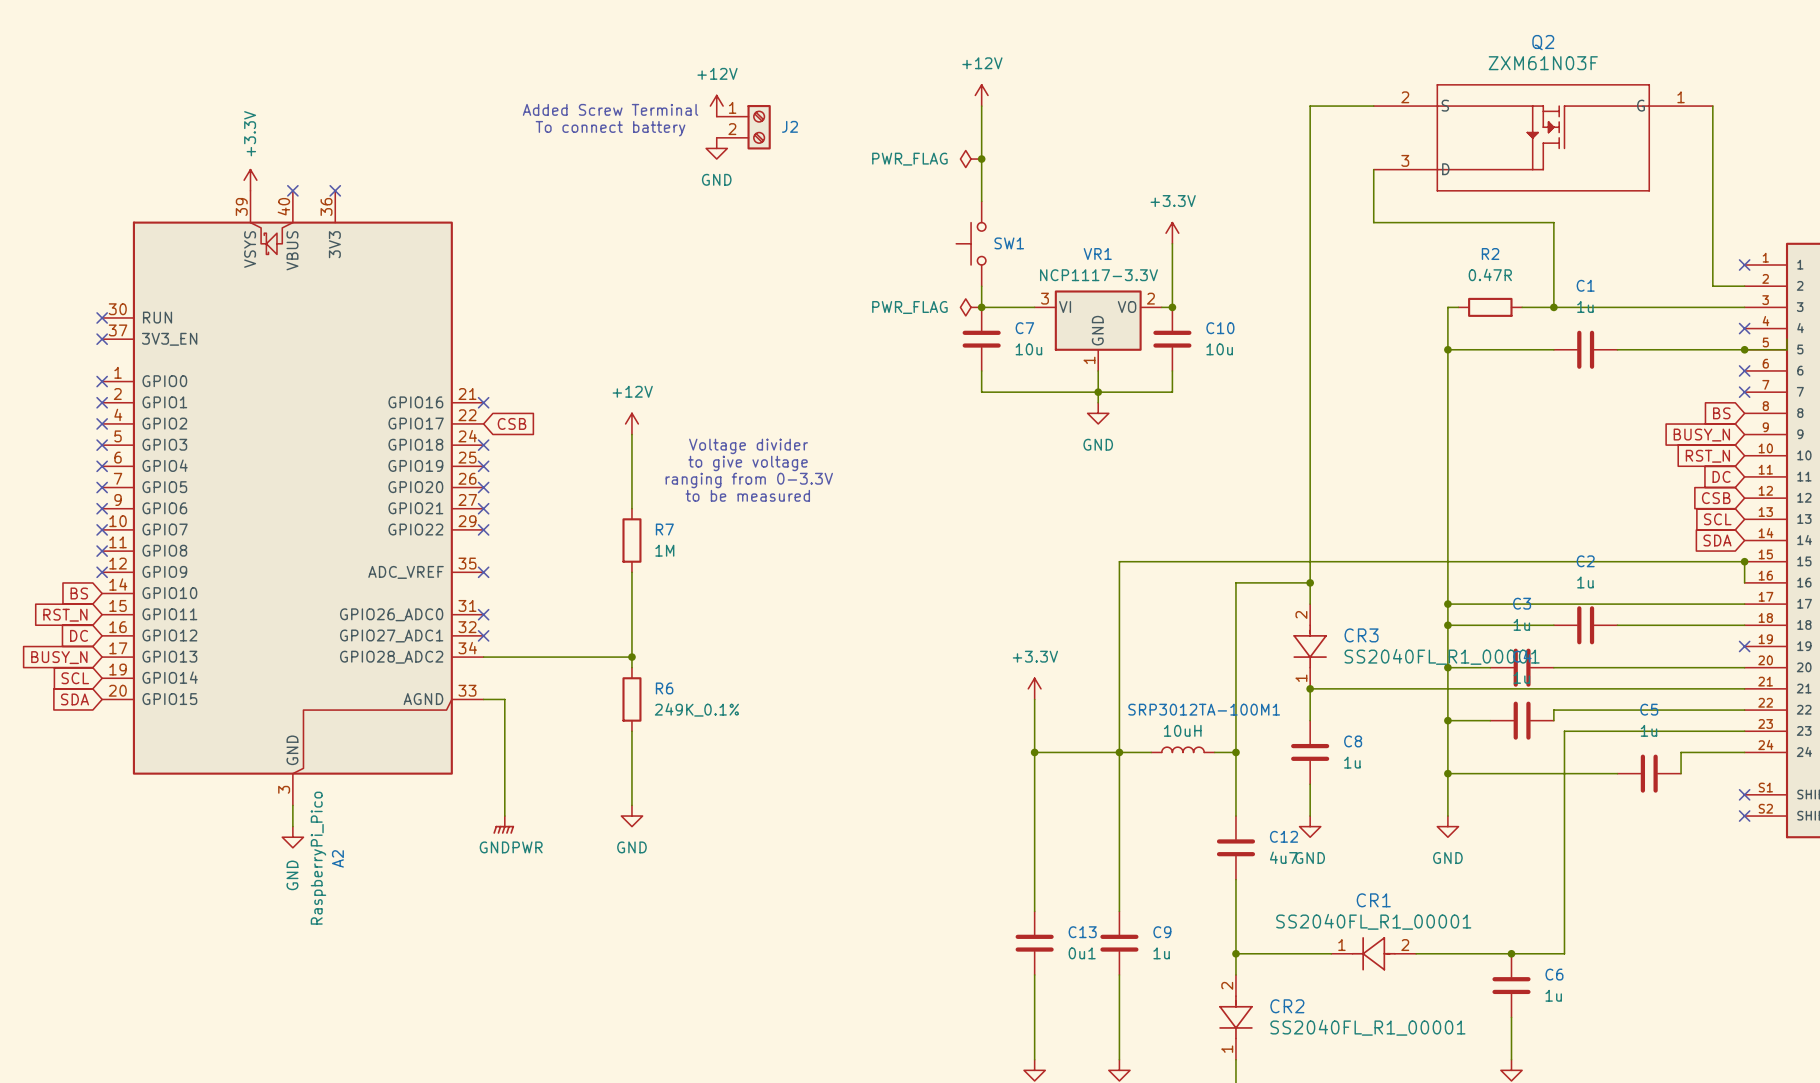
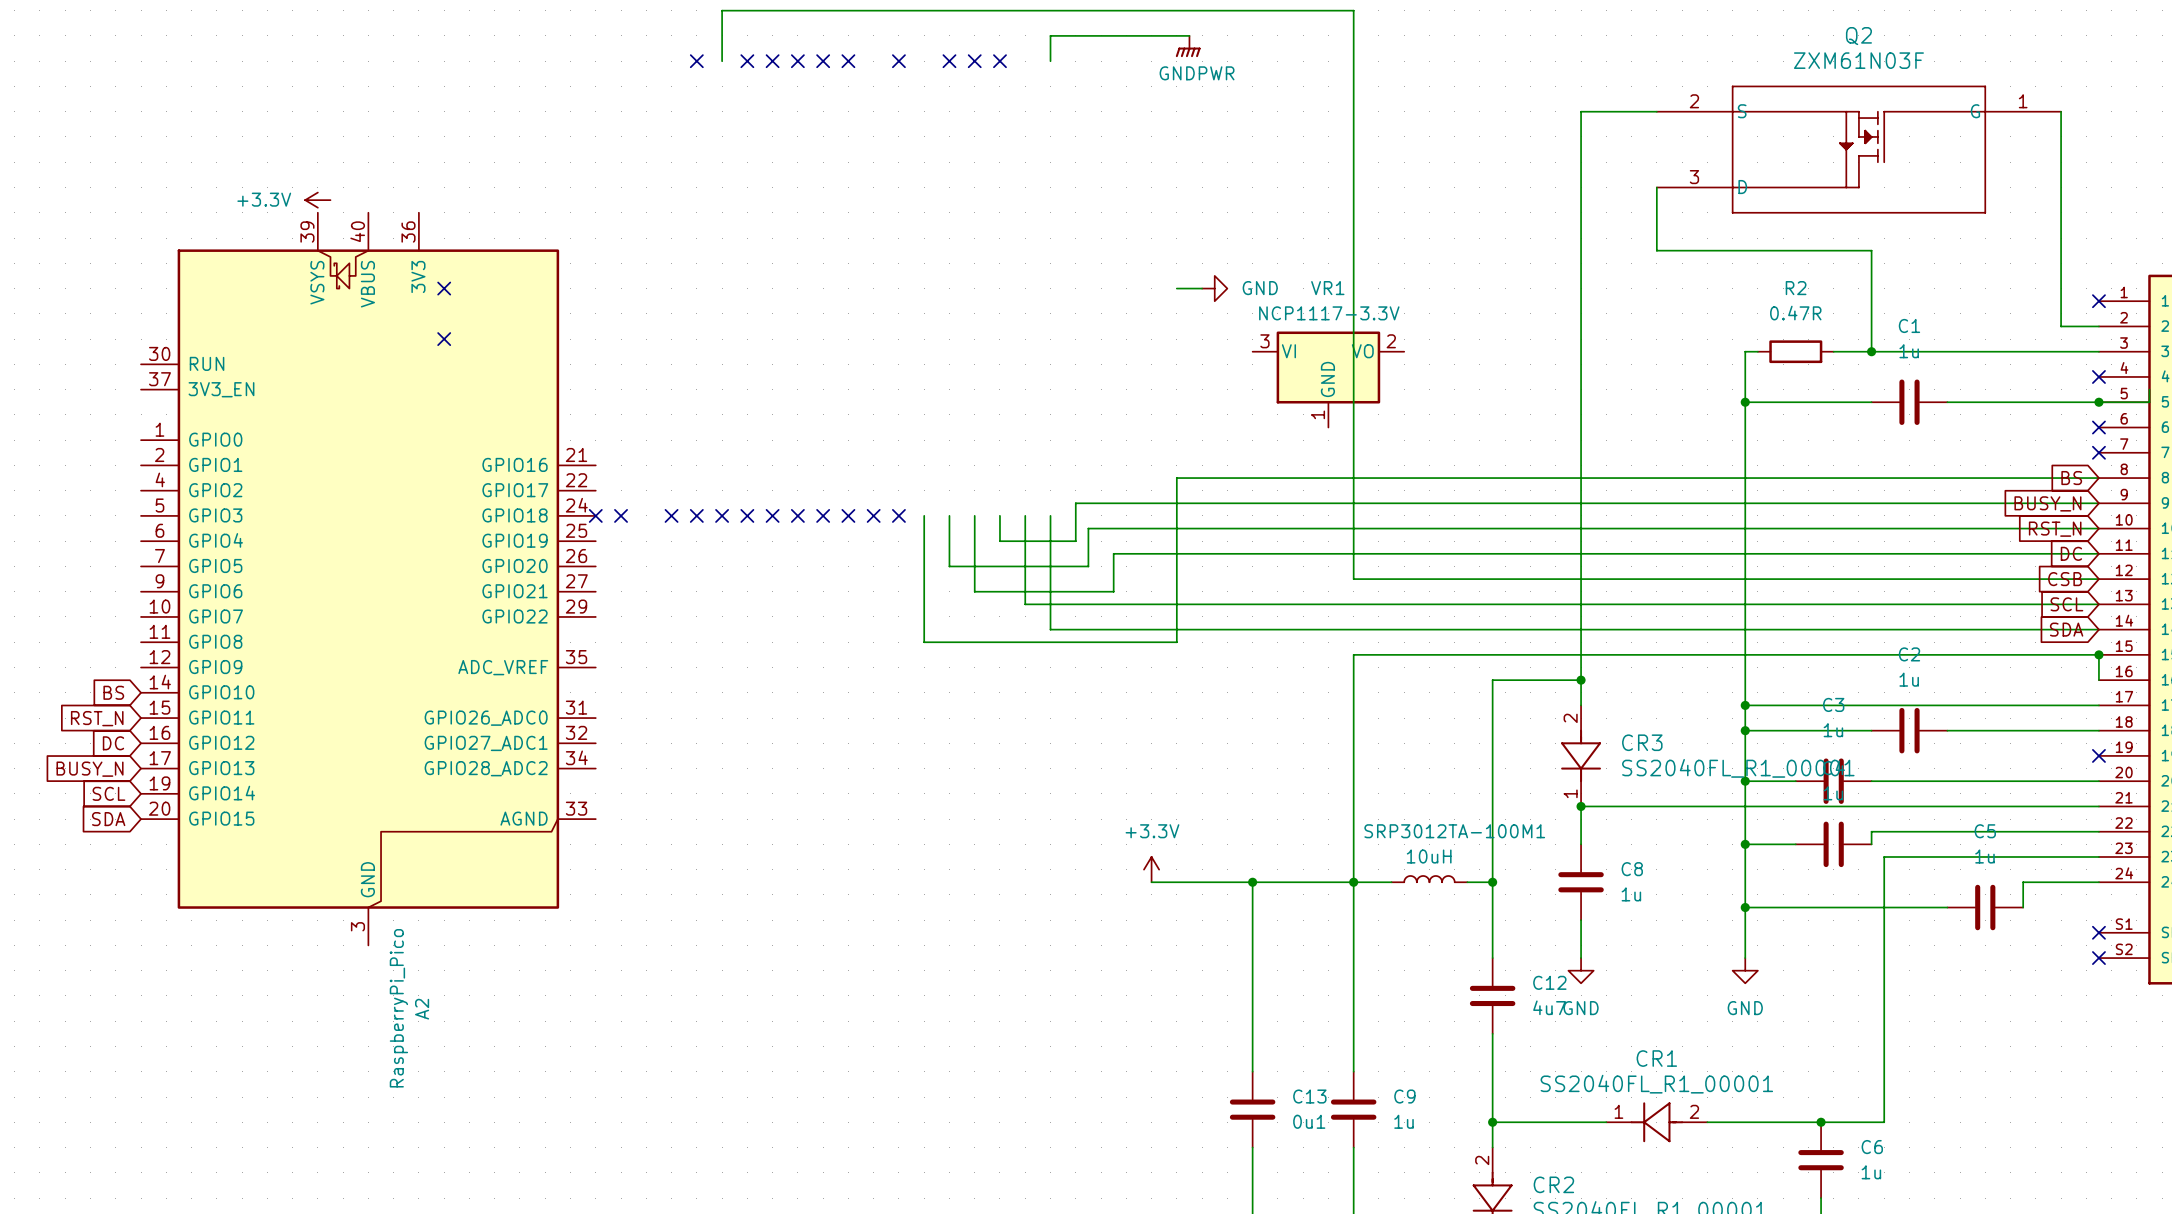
wire: none -> (1189, 35) (1050, 35) (1050, 61)
power symbol: none -> GNDPWR (1188, 46)
no-connect mark: none -> (696, 61)
wire: none -> (722, 61) (722, 10) (1353, 10) (1353, 579) (2098, 579)
no-connect mark: none -> (747, 61)
no-connect mark: none -> (772, 61)
no-connect mark: none -> (797, 61)
no-connect mark: none -> (823, 61)
no-connect mark: none -> (848, 61)
no-connect mark: none -> (898, 61)
no-connect mark: none -> (949, 61)
no-connect mark: none -> (974, 61)
no-connect mark: none -> (999, 61)
power symbol: +12V (981, 95) -> none
power symbol: +12V (716, 106) -> none
wire: (981, 106) (981, 201) -> none
text: Added Screw Terminal (610, 109) -> none
J2: (743, 127) -> none
text: To connect battery (610, 128) -> none
power symbol: GND (716, 148) -> none
power symbol: PWR_FLAG (971, 159) -> none
junction: (981, 159) -> none
power symbol rotation: 0° (250, 180) -> 90° counterclockwise (317, 200)
no-connect mark: (292, 190) -> none
no-connect mark: (335, 190) -> none
power symbol: +3.3V (1172, 233) -> none
SW1: (971, 243) -> none
wire: (1172, 243) (1172, 307) (1161, 307) -> none
no-connect mark: none -> (444, 288)
wire: none -> (1176, 288) (1202, 288)
power symbol: none -> GND (1214, 288)
wire: (981, 286) (981, 307) (1034, 307) -> none
no-connect mark: none -> (444, 339)
power symbol: PWR_FLAG (971, 307) -> none
junction: (981, 307) -> none
junction: (1172, 307) -> none
no-connect mark: (102, 317) -> none
no-connect mark: (102, 339) -> none
C7: 10u (981, 339) -> none
C10: 10u (1172, 339) -> none
wire: (981, 370) (981, 392) (1172, 392) (1172, 370) -> none
wire: (1098, 370) (1098, 402) -> none
no-connect mark: (102, 381) -> none
junction: (1098, 392) -> none
no-connect mark: (102, 402) -> none
no-connect mark: (483, 402) -> none
power symbol: GND (1098, 413) -> none
wire: none -> (2098, 478) (1176, 478) (1176, 642) (924, 642) (924, 515)
no-connect mark: (102, 423) -> none
global label: CSB (512, 423) -> none
power symbol: +12V (631, 423) -> none
wire: (631, 434) (631, 508) -> none
wire: none -> (2098, 503) (1075, 503) (1075, 541) (999, 541) (999, 515)
no-connect mark: (102, 445) -> none
no-connect mark: none -> (621, 515)
no-connect mark: none -> (671, 515)
no-connect mark: none -> (696, 515)
no-connect mark: none -> (722, 515)
no-connect mark: none -> (747, 515)
no-connect mark: none -> (772, 515)
no-connect mark: none -> (797, 515)
no-connect mark: none -> (823, 515)
no-connect mark: none -> (848, 515)
no-connect mark: none -> (873, 515)
no-connect mark: none -> (898, 515)
wire: none -> (949, 515) (949, 566) (1088, 566) (1088, 528) (2098, 528)
wire: none -> (974, 515) (974, 591) (1113, 591) (1113, 553) (2098, 553)
wire: none -> (1025, 515) (1025, 604) (2098, 604)
wire: none -> (1050, 515) (1050, 629) (2098, 629)
text: Voltage divider (748, 446) -> none
text: to give voltage (748, 463) -> none
no-connect mark: (102, 466) -> none
no-connect mark: (483, 466) -> none
text: ranging from 0-3.3V (749, 480) -> none
no-connect mark: (102, 487) -> none
no-connect mark: (483, 487) -> none
text: to be measured (747, 495) -> none
no-connect mark: (102, 508) -> none
no-connect mark: (483, 508) -> none
no-connect mark: (102, 529) -> none
no-connect mark: (483, 529) -> none
R7: 1M (631, 540) -> none
no-connect mark: (102, 551) -> none
no-connect mark: (102, 572) -> none
no-connect mark: (483, 572) -> none
wire: (631, 572) (631, 667) -> none
no-connect mark: (483, 614) -> none
no-connect mark: (483, 635) -> none
wire: (483, 657) (631, 657) -> none
junction: (631, 657) -> none
power symbol position: +3.3V (1034, 688) -> +3.3V (1151, 869)
wire: (483, 699) (504, 699) (504, 816) -> none
R6: 249K_0.1% (631, 699) -> none
wire: (1034, 699) (1034, 752) -> (1151, 882) (1252, 882)
wire: (631, 731) (631, 805) -> none
wire: (292, 805) (292, 826) -> none
power symbol: GND (631, 816) -> none
power symbol: GNDPWR (503, 824) -> none
power symbol: GND (292, 837) -> none

